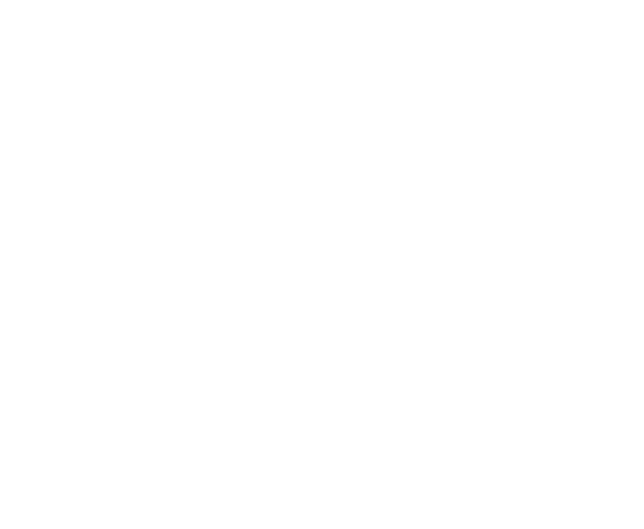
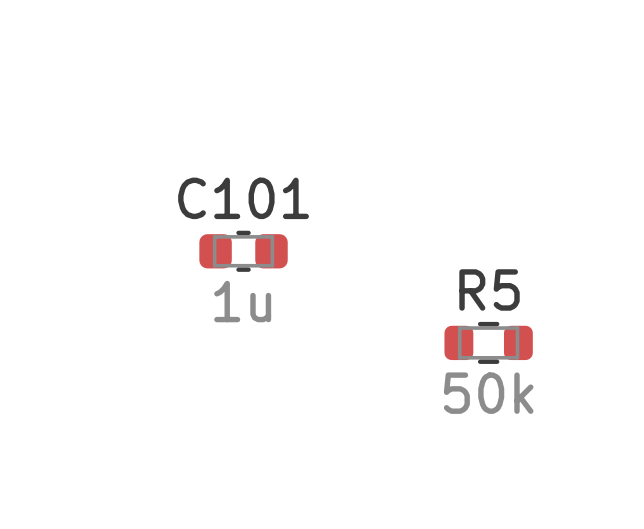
C101: none -> 1u (243, 251)
R5: none -> 50k (488, 342)

